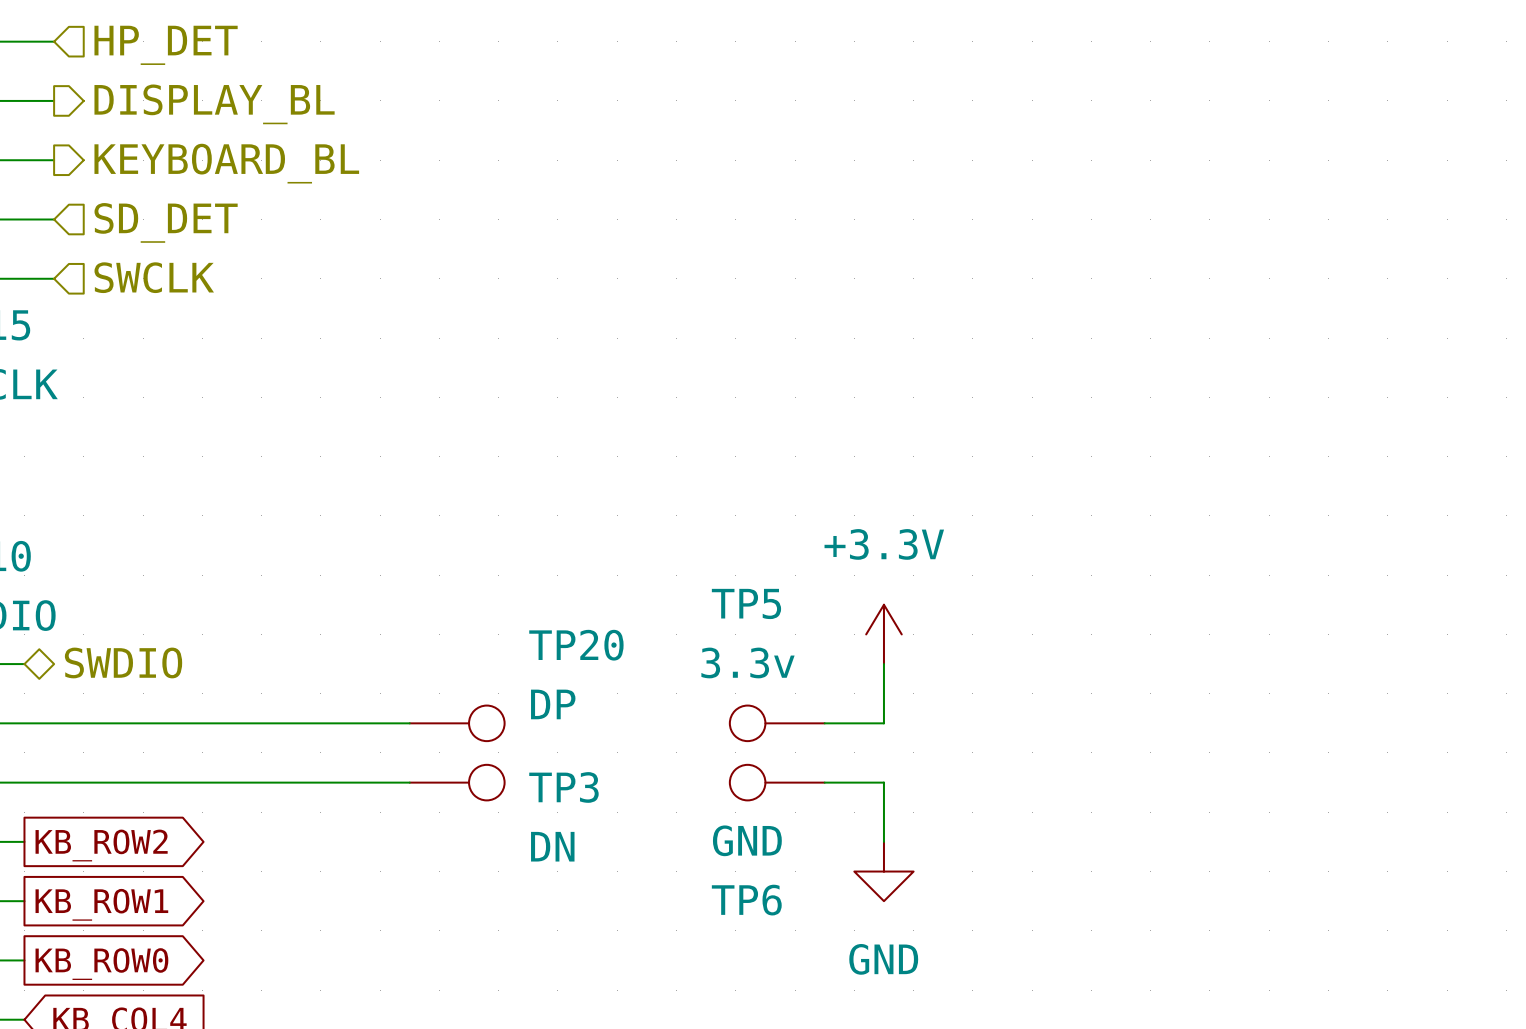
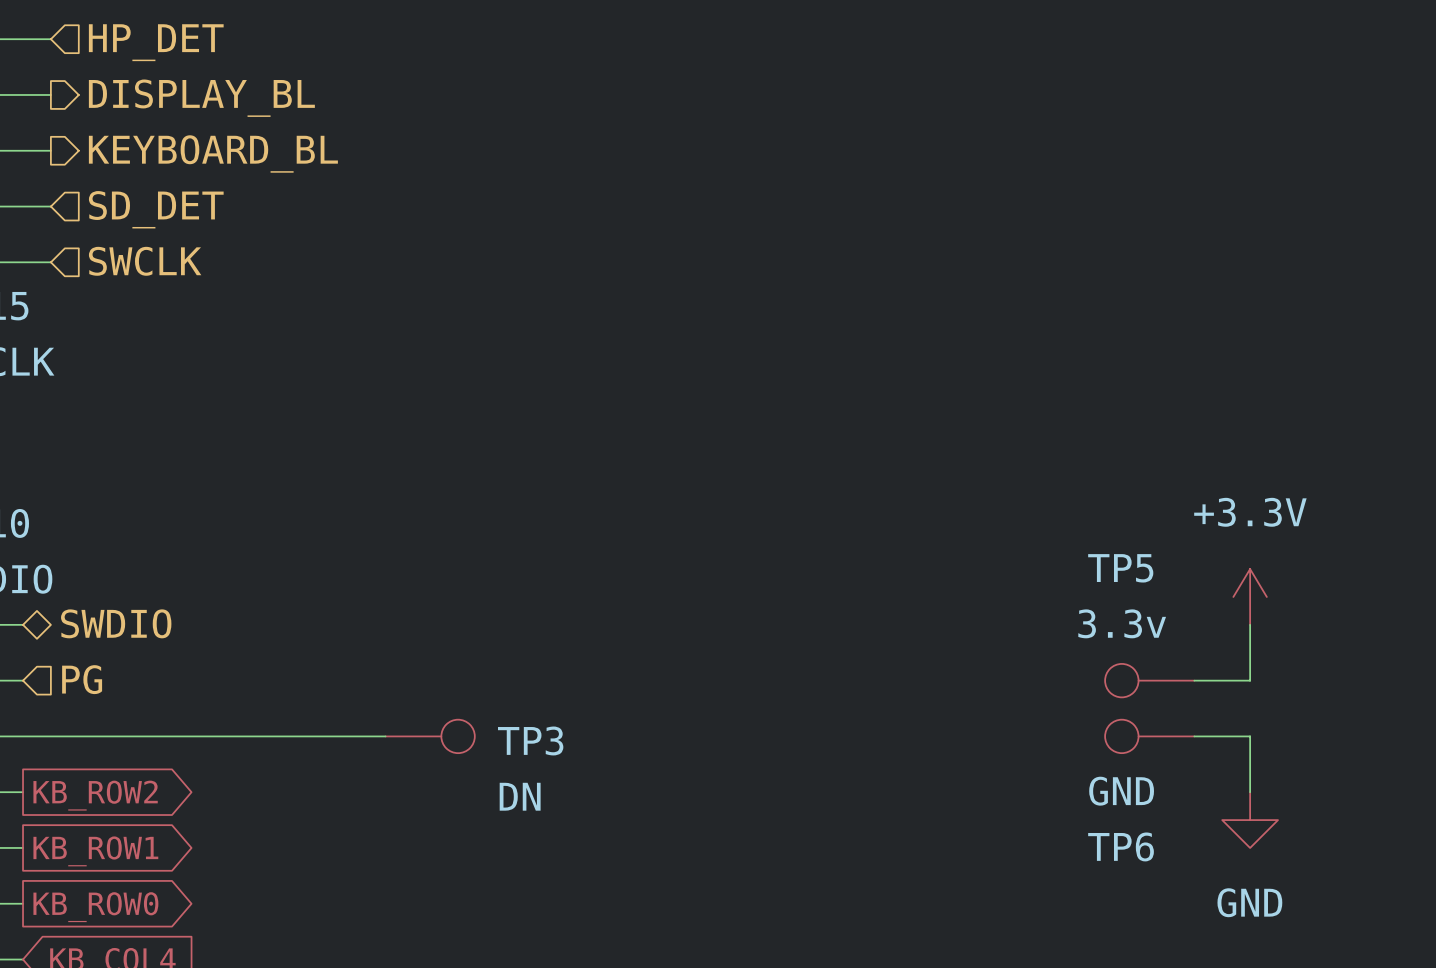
power symbol position: +3.3V (883, 634) -> +3.3V (1250, 596)
wire: (883, 664) (883, 723) (824, 723) -> (1250, 624) (1250, 680) (1194, 680)
hierarchical label: none -> PG (82, 679)
wire: (24, 723) (409, 723) -> none
TP20: DP (457, 723) -> none
TP5 position: (777, 723) -> (1149, 680)
TP6 position: (777, 782) -> (1149, 736)
wire: (824, 782) (883, 782) (883, 841) -> (1194, 736) (1250, 736) (1250, 792)
power symbol position: GND (883, 871) -> GND (1250, 820)

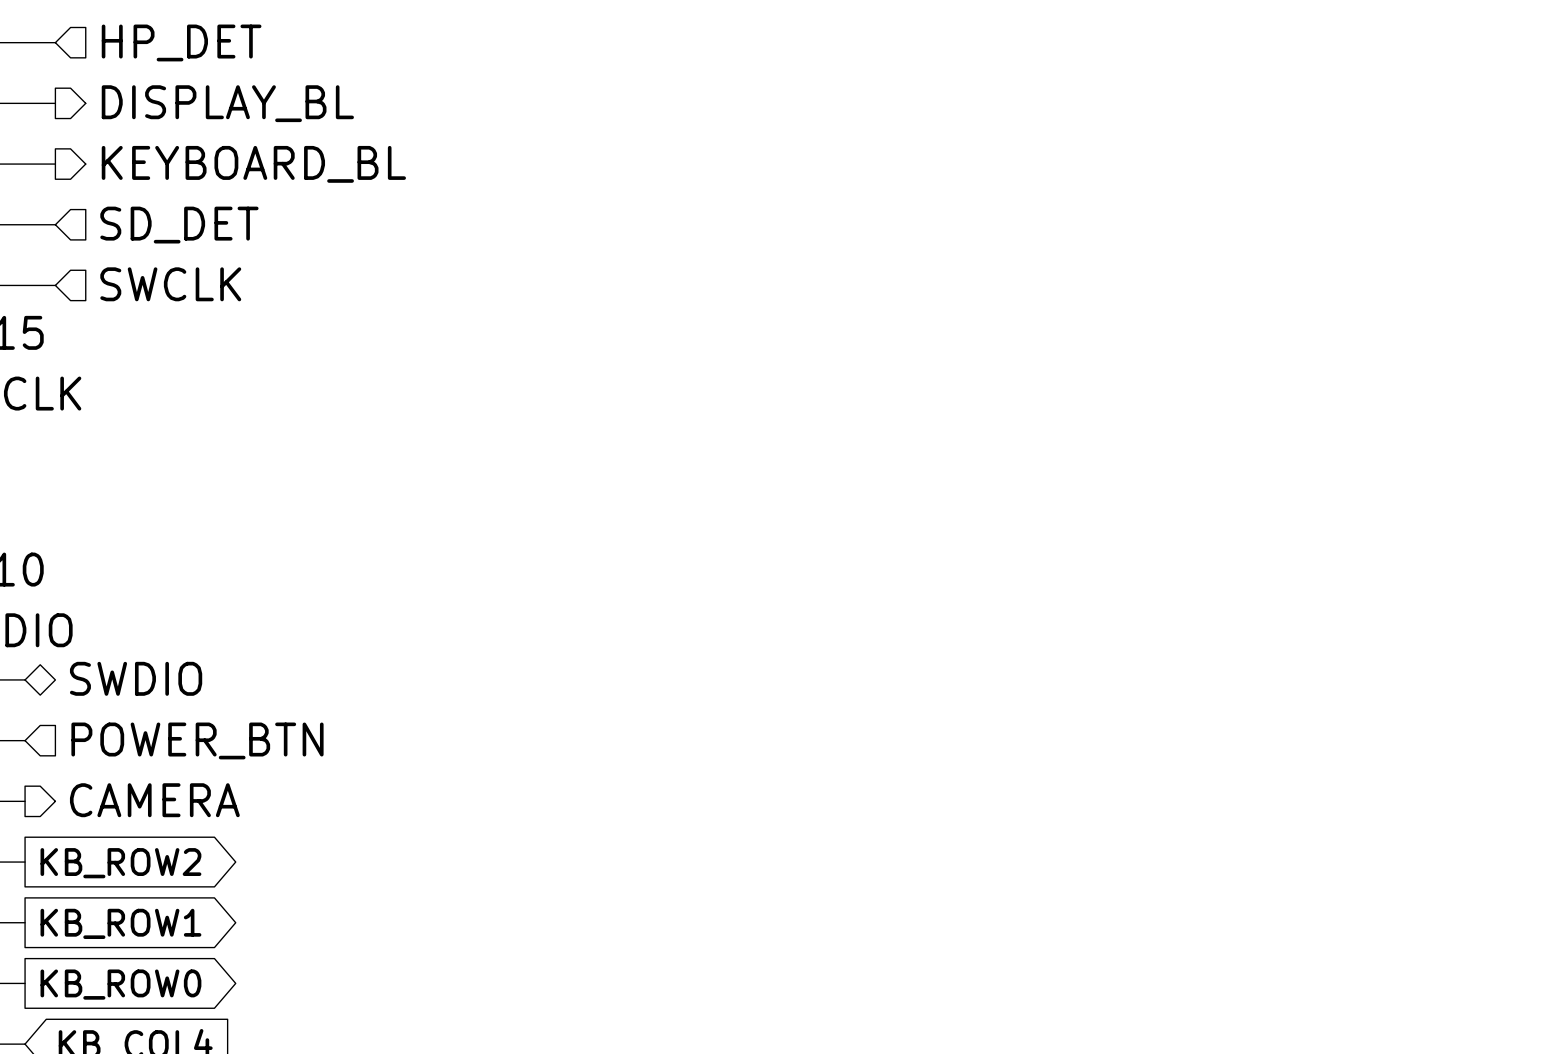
power symbol: +3.3V (1250, 596) -> none
wire: (1250, 624) (1250, 680) (1194, 680) -> none
hierarchical label: PG (82, 679) -> POWER_BTN (197, 740)
TP5: 3.3v (1149, 680) -> none
hierarchical label: none -> CAMERA (154, 800)
wire: (23, 736) (385, 736) -> none
TP3: DN (430, 736) -> none
TP6: GND (1149, 736) -> none
wire: (1194, 736) (1250, 736) (1250, 792) -> none
power symbol: GND (1250, 820) -> none

